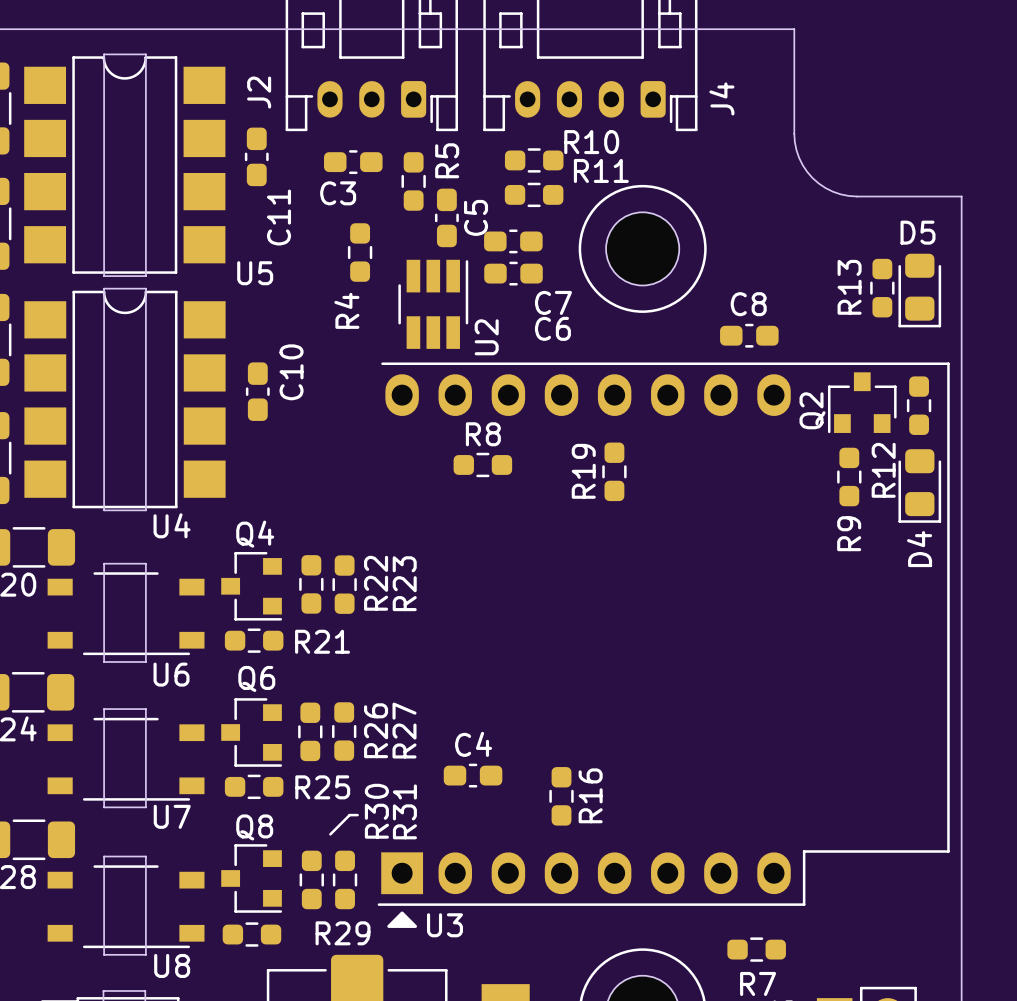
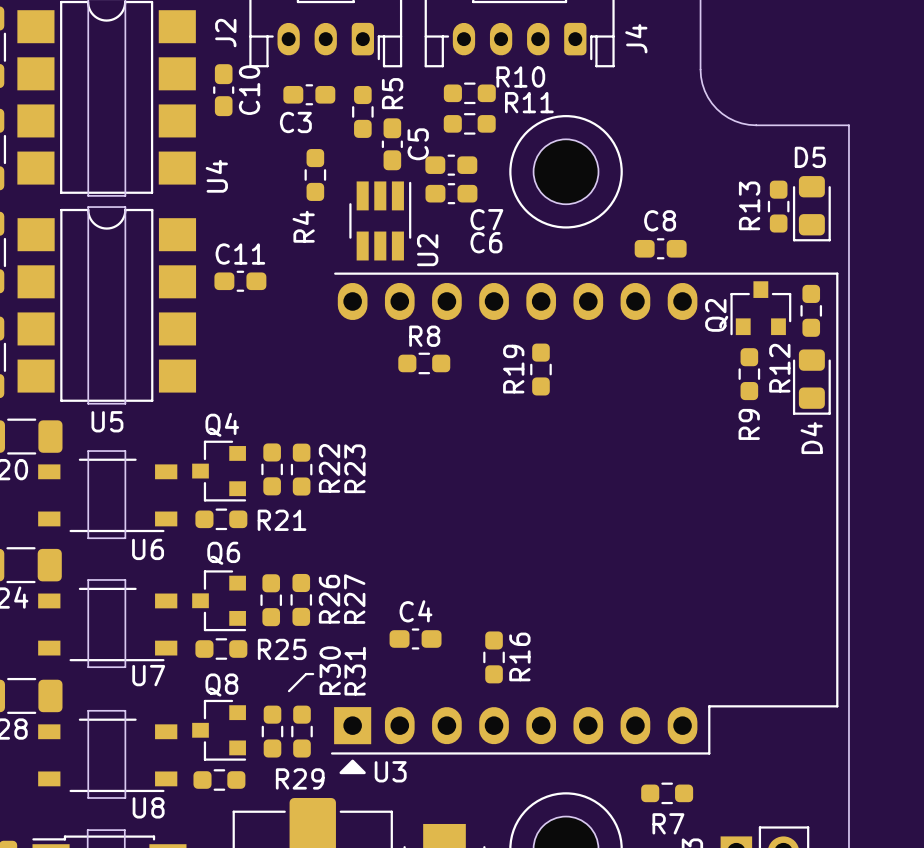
C11 name: C11 (279, 217) -> C10 (249, 90)
U5 name: U5 (255, 273) -> U4 (216, 176)
C11: none -> (240, 281)
C10: (257, 391) -> none
U4 name: U4 (172, 525) -> U5 (107, 421)

